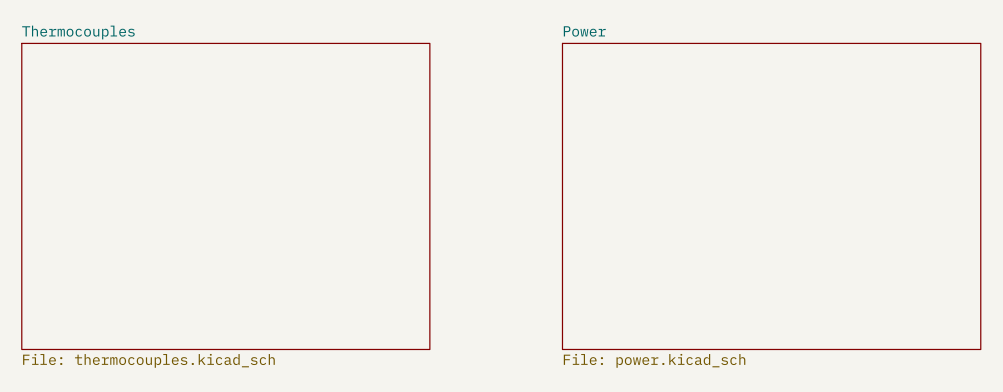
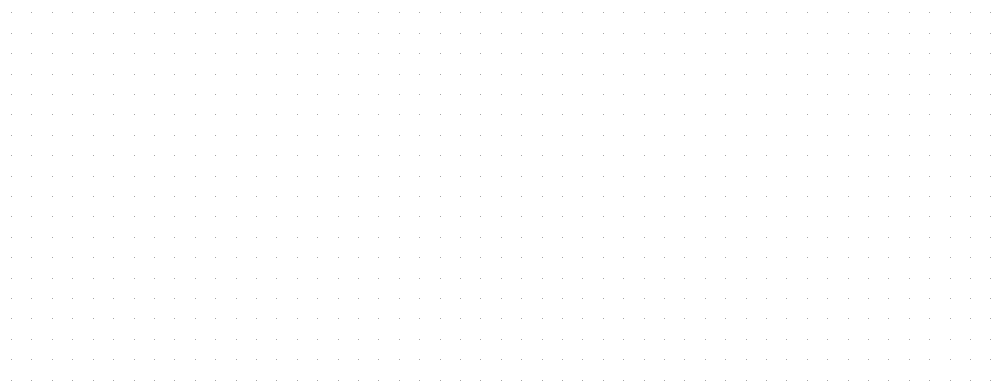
sheet Thermocouples: File: thermocouples.kicad_sch (225, 196) -> none
sheet Power: File: power.kicad_sch (771, 196) -> none

